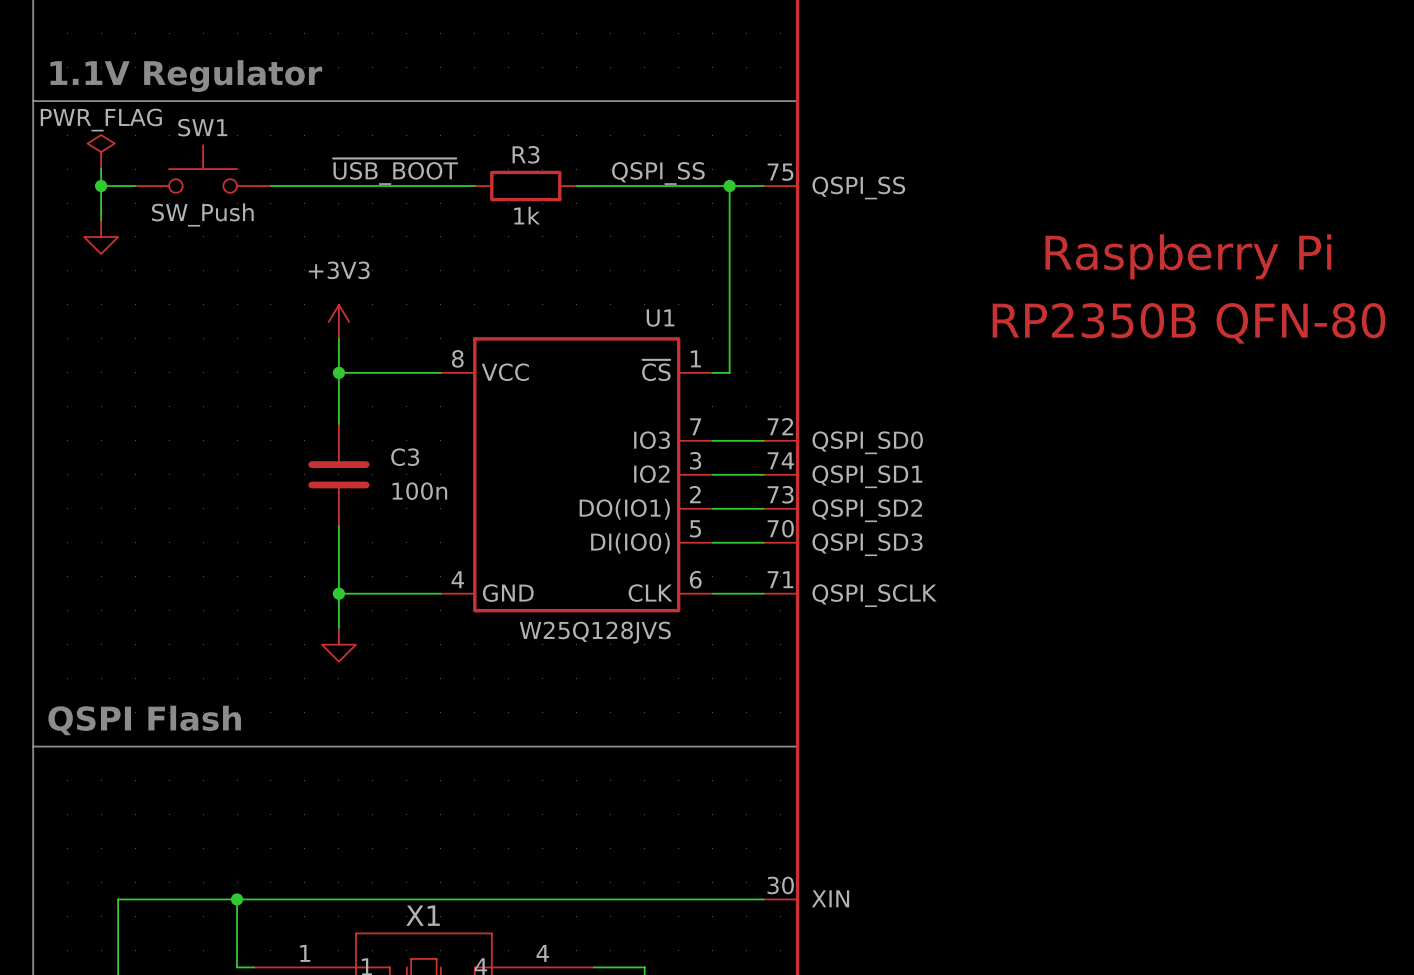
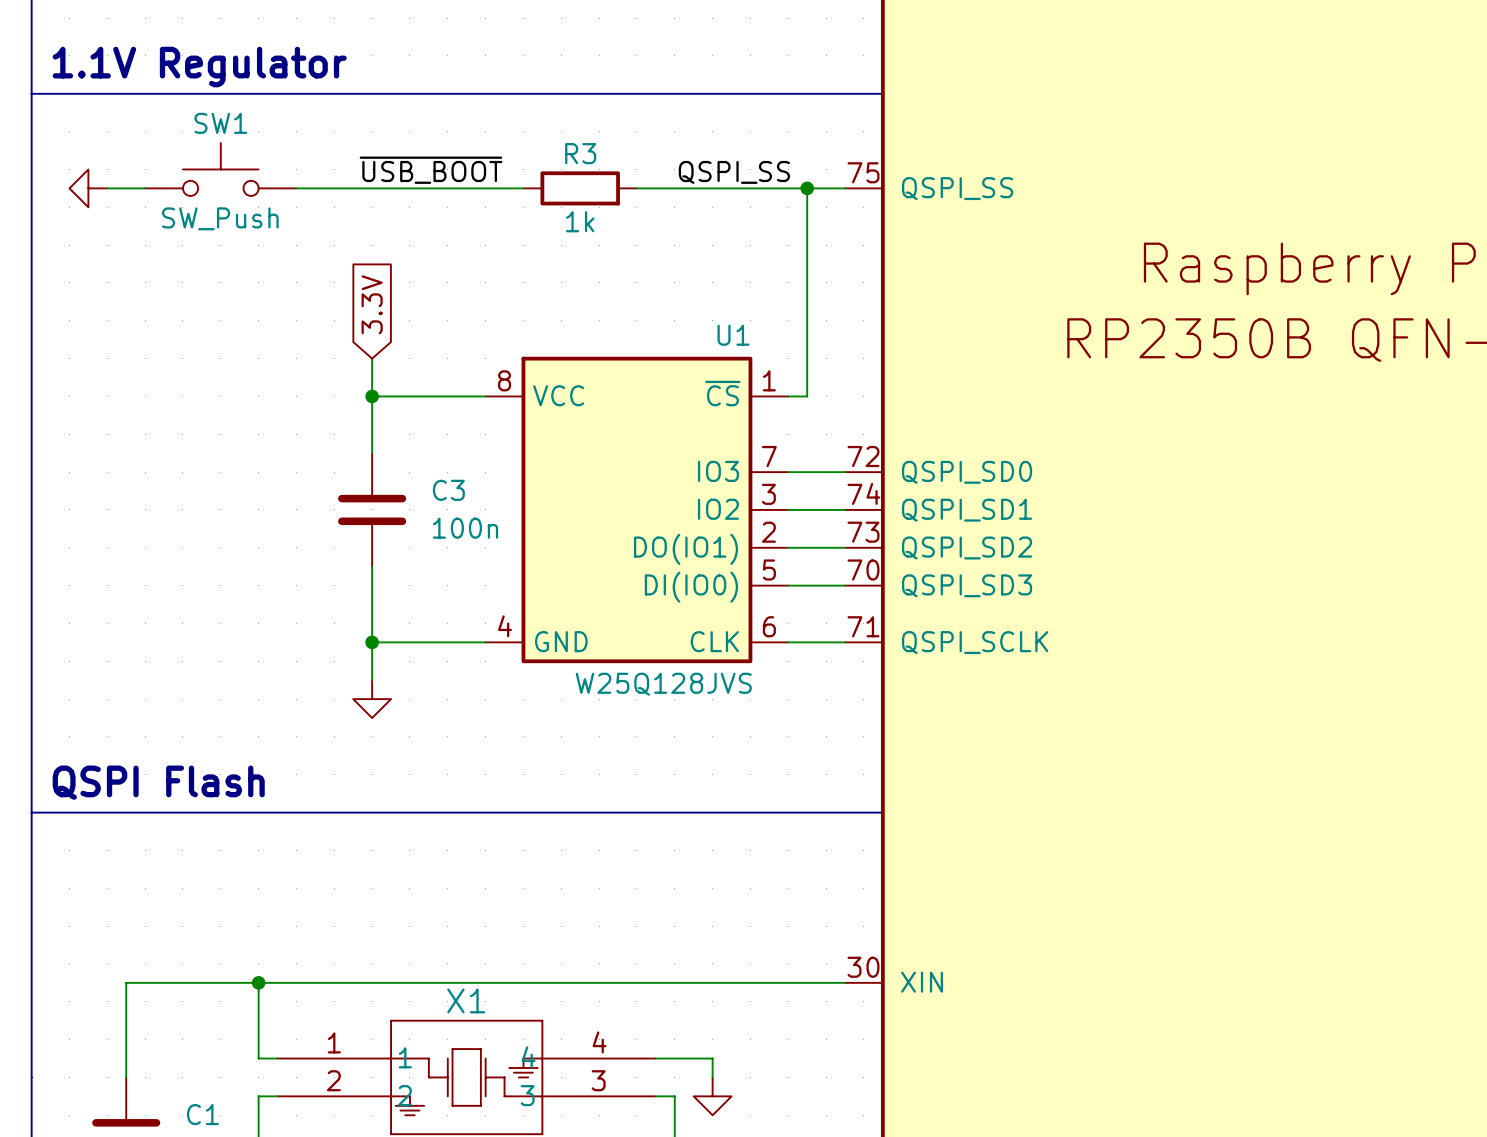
power symbol: PWR_FLAG (101, 152) -> none
wire: (101, 169) (101, 220) -> none
junction: (101, 186) -> none
power symbol rotation: 0° (101, 236) -> 90° clockwise (88, 188)
power symbol position: (101, 236) -> (88, 188)
global label: none -> 3.3V (372, 304)
power symbol: +3V3 (338, 321) -> none

